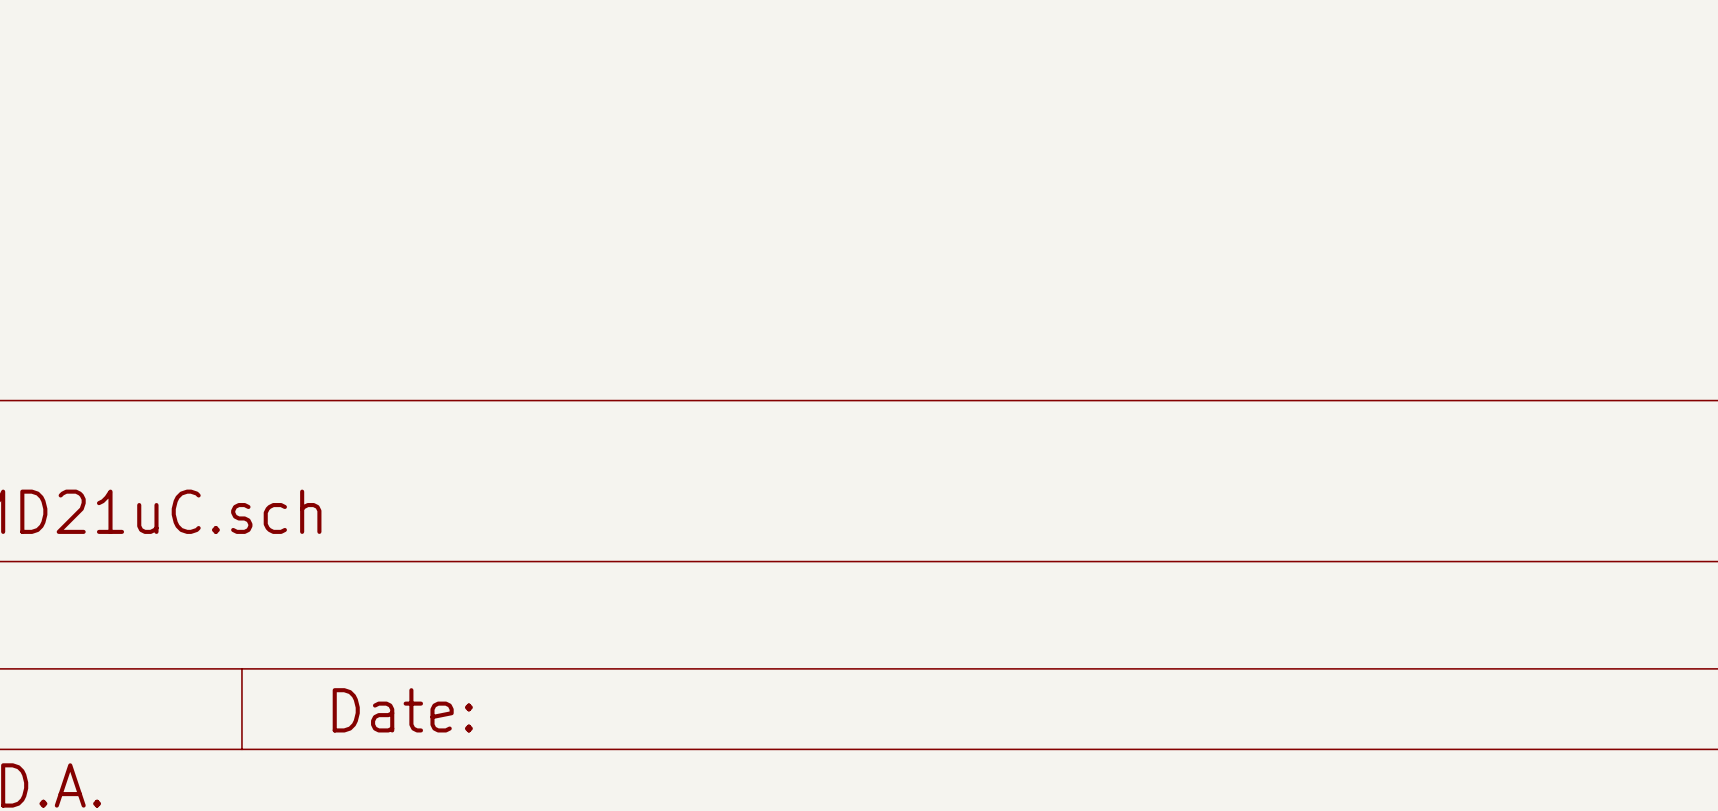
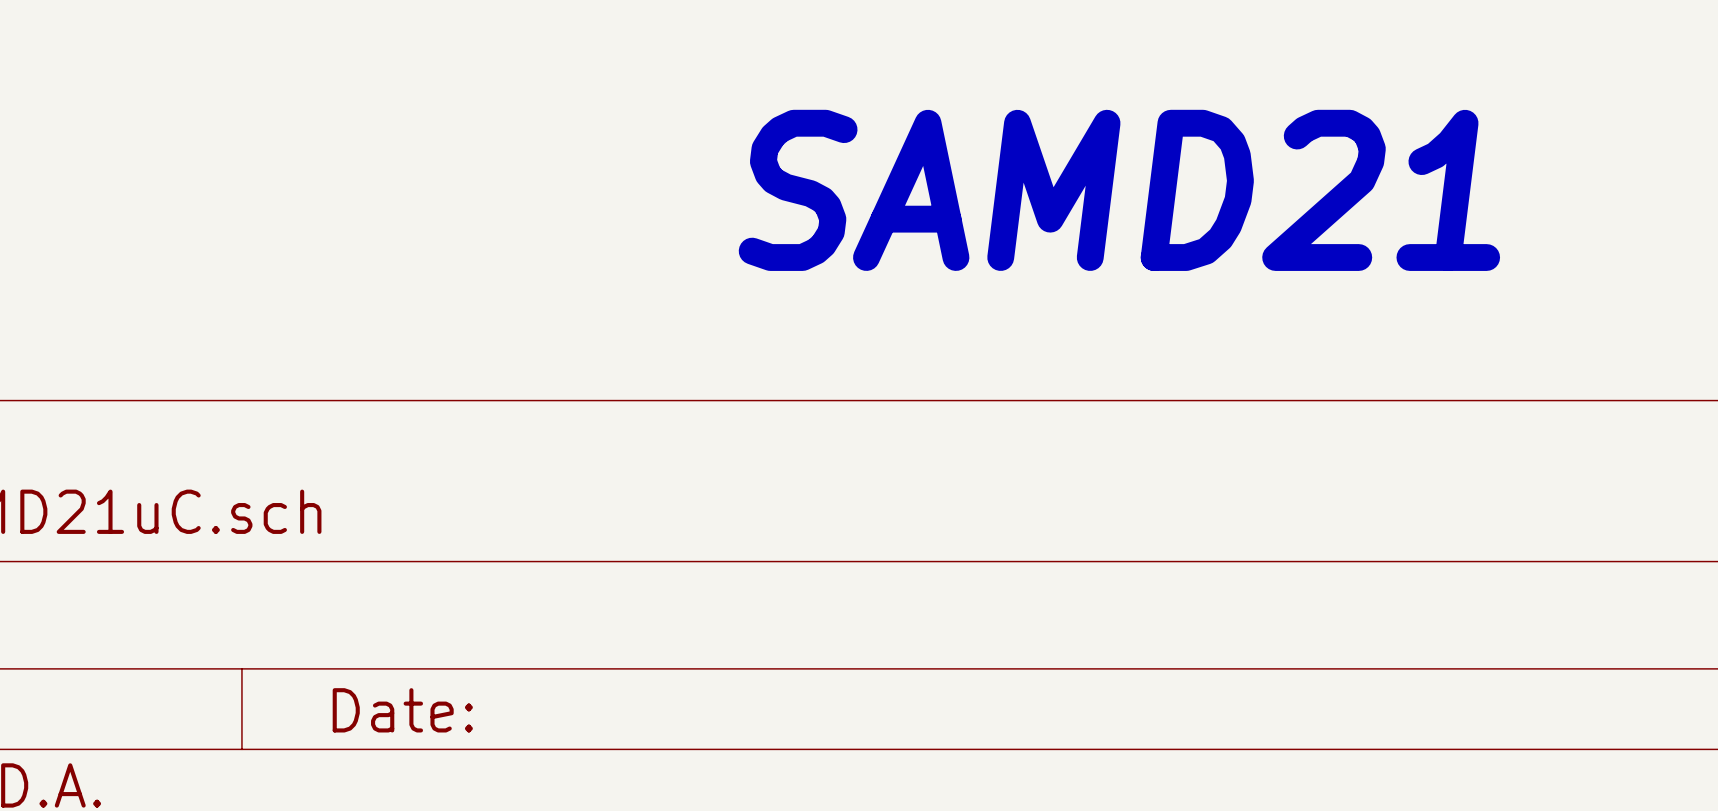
text: none -> SAMD21 (1119, 190)

